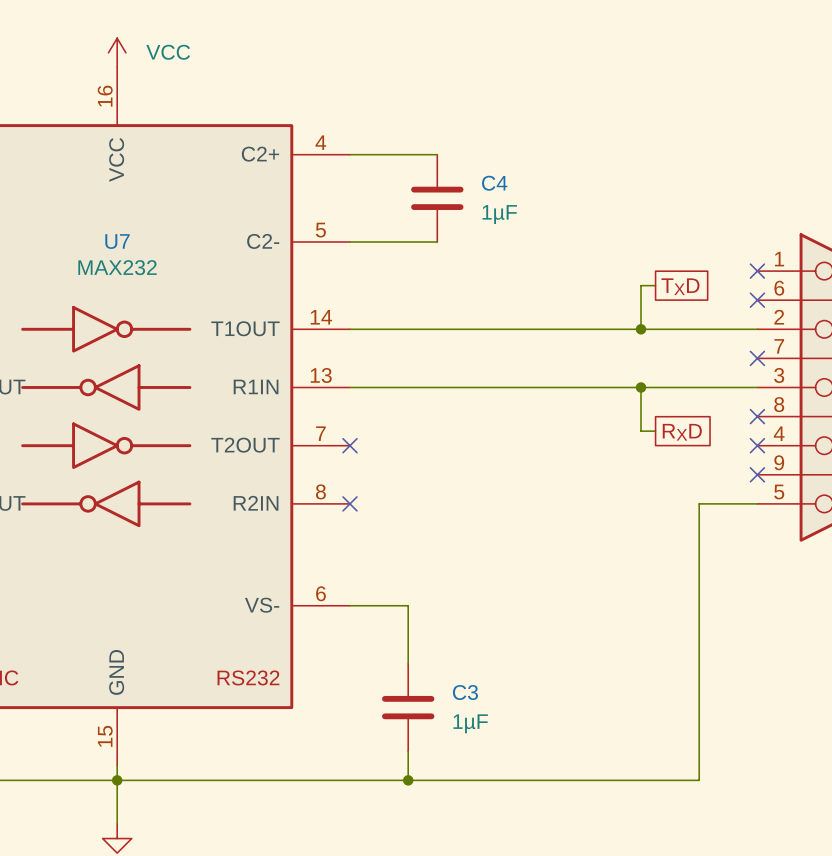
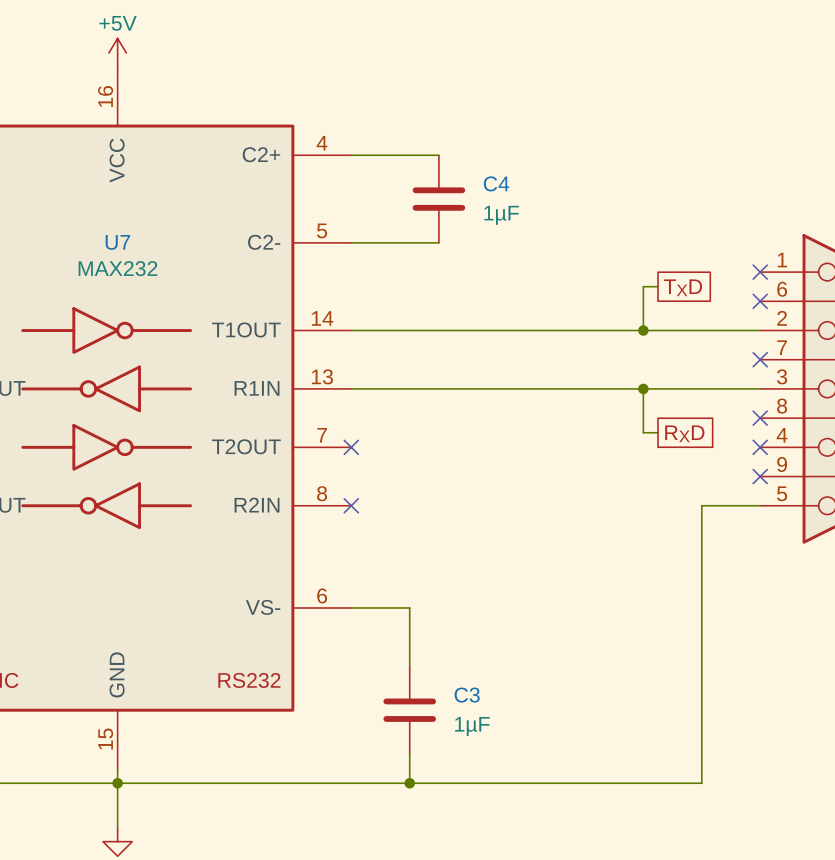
power symbol: VCC (117, 52) -> +5V (117, 53)

